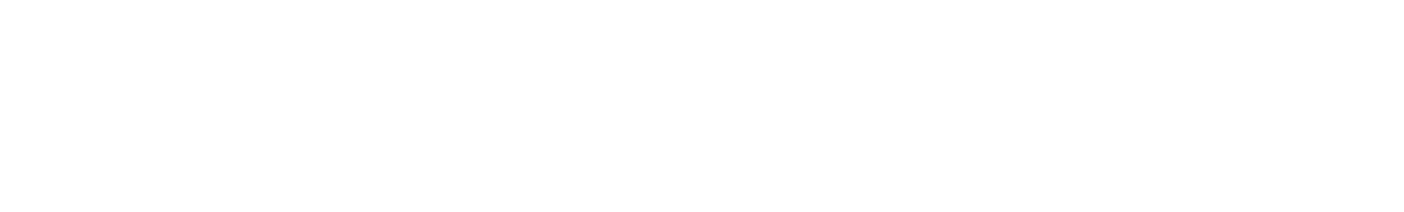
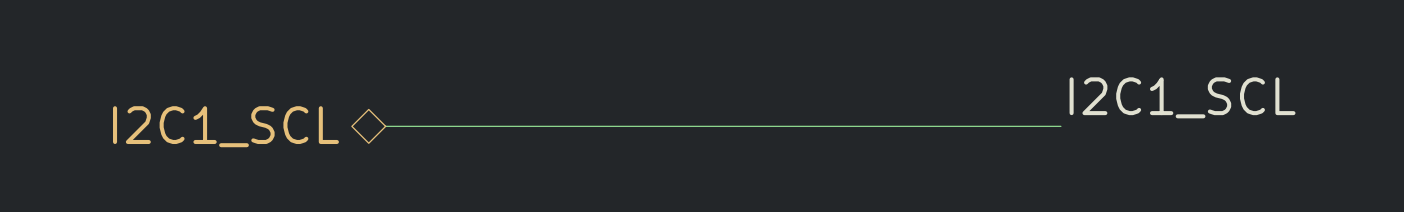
label: none -> I2C1_SCL (1182, 97)
wire: none -> (385, 126) (1060, 126)
hierarchical label: none -> I2C1_SCL (225, 126)

